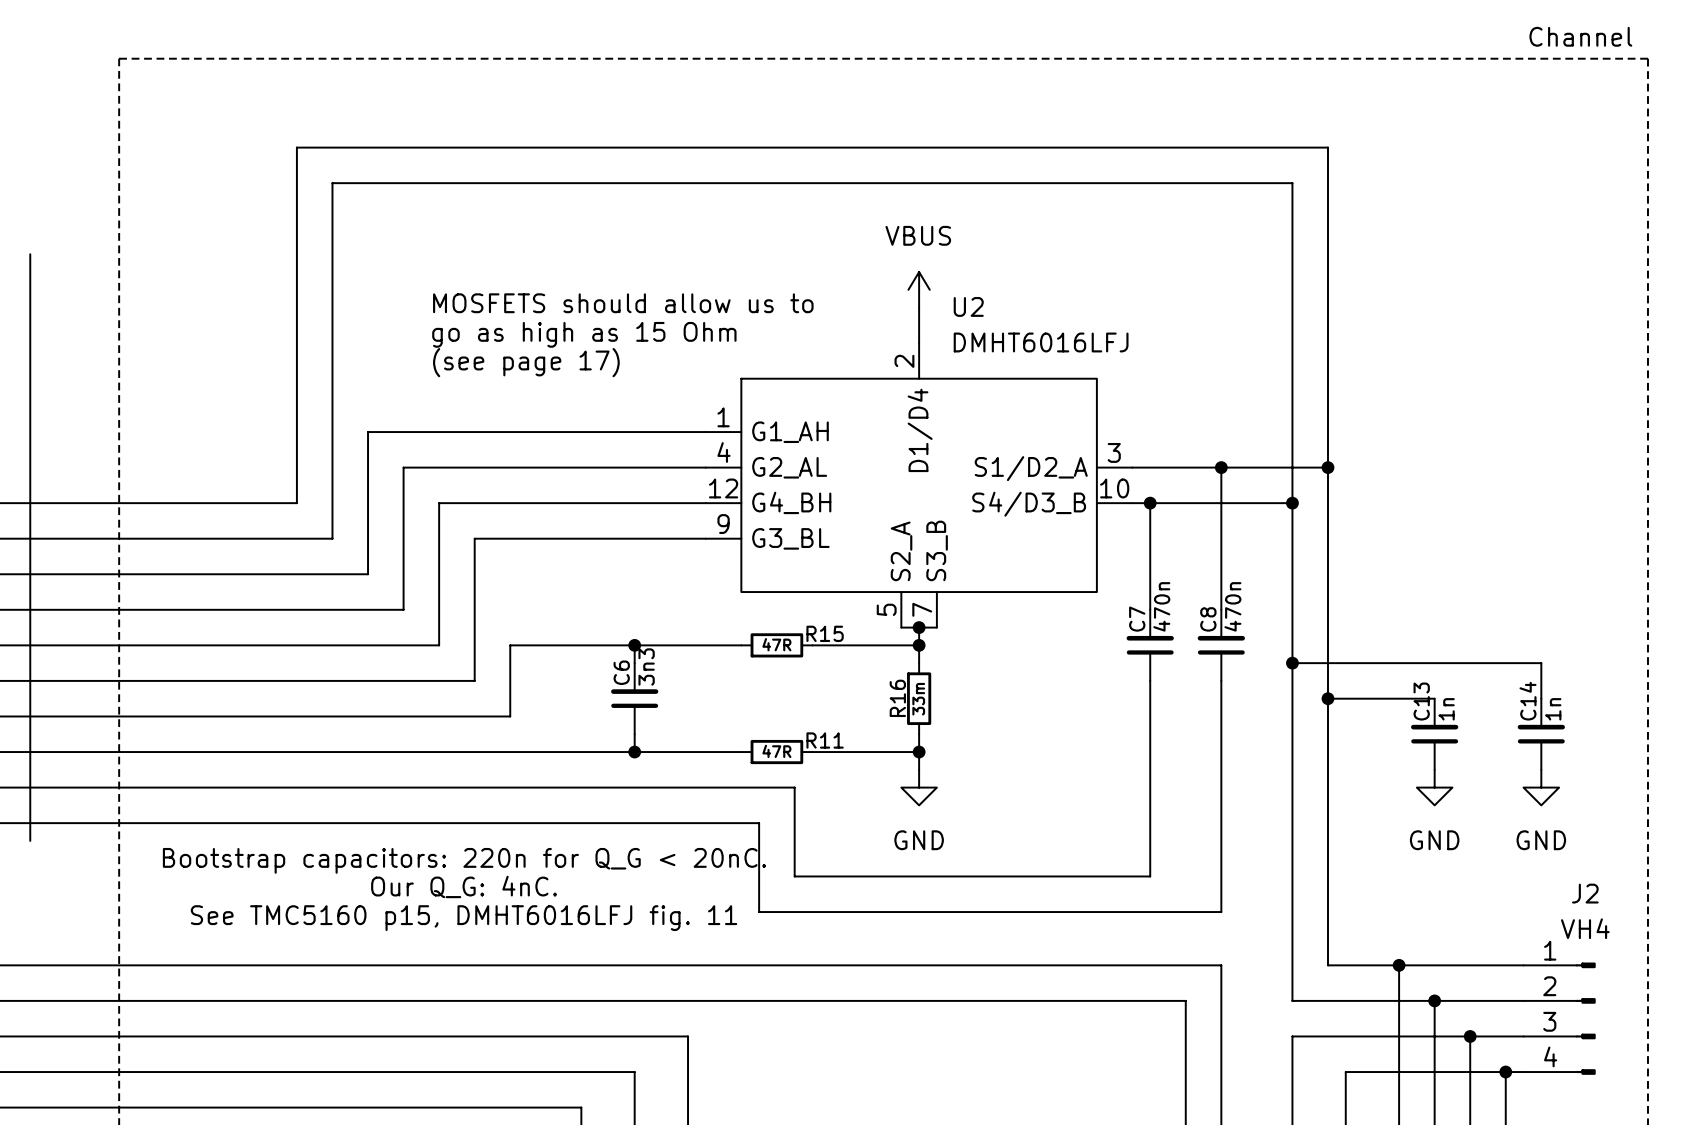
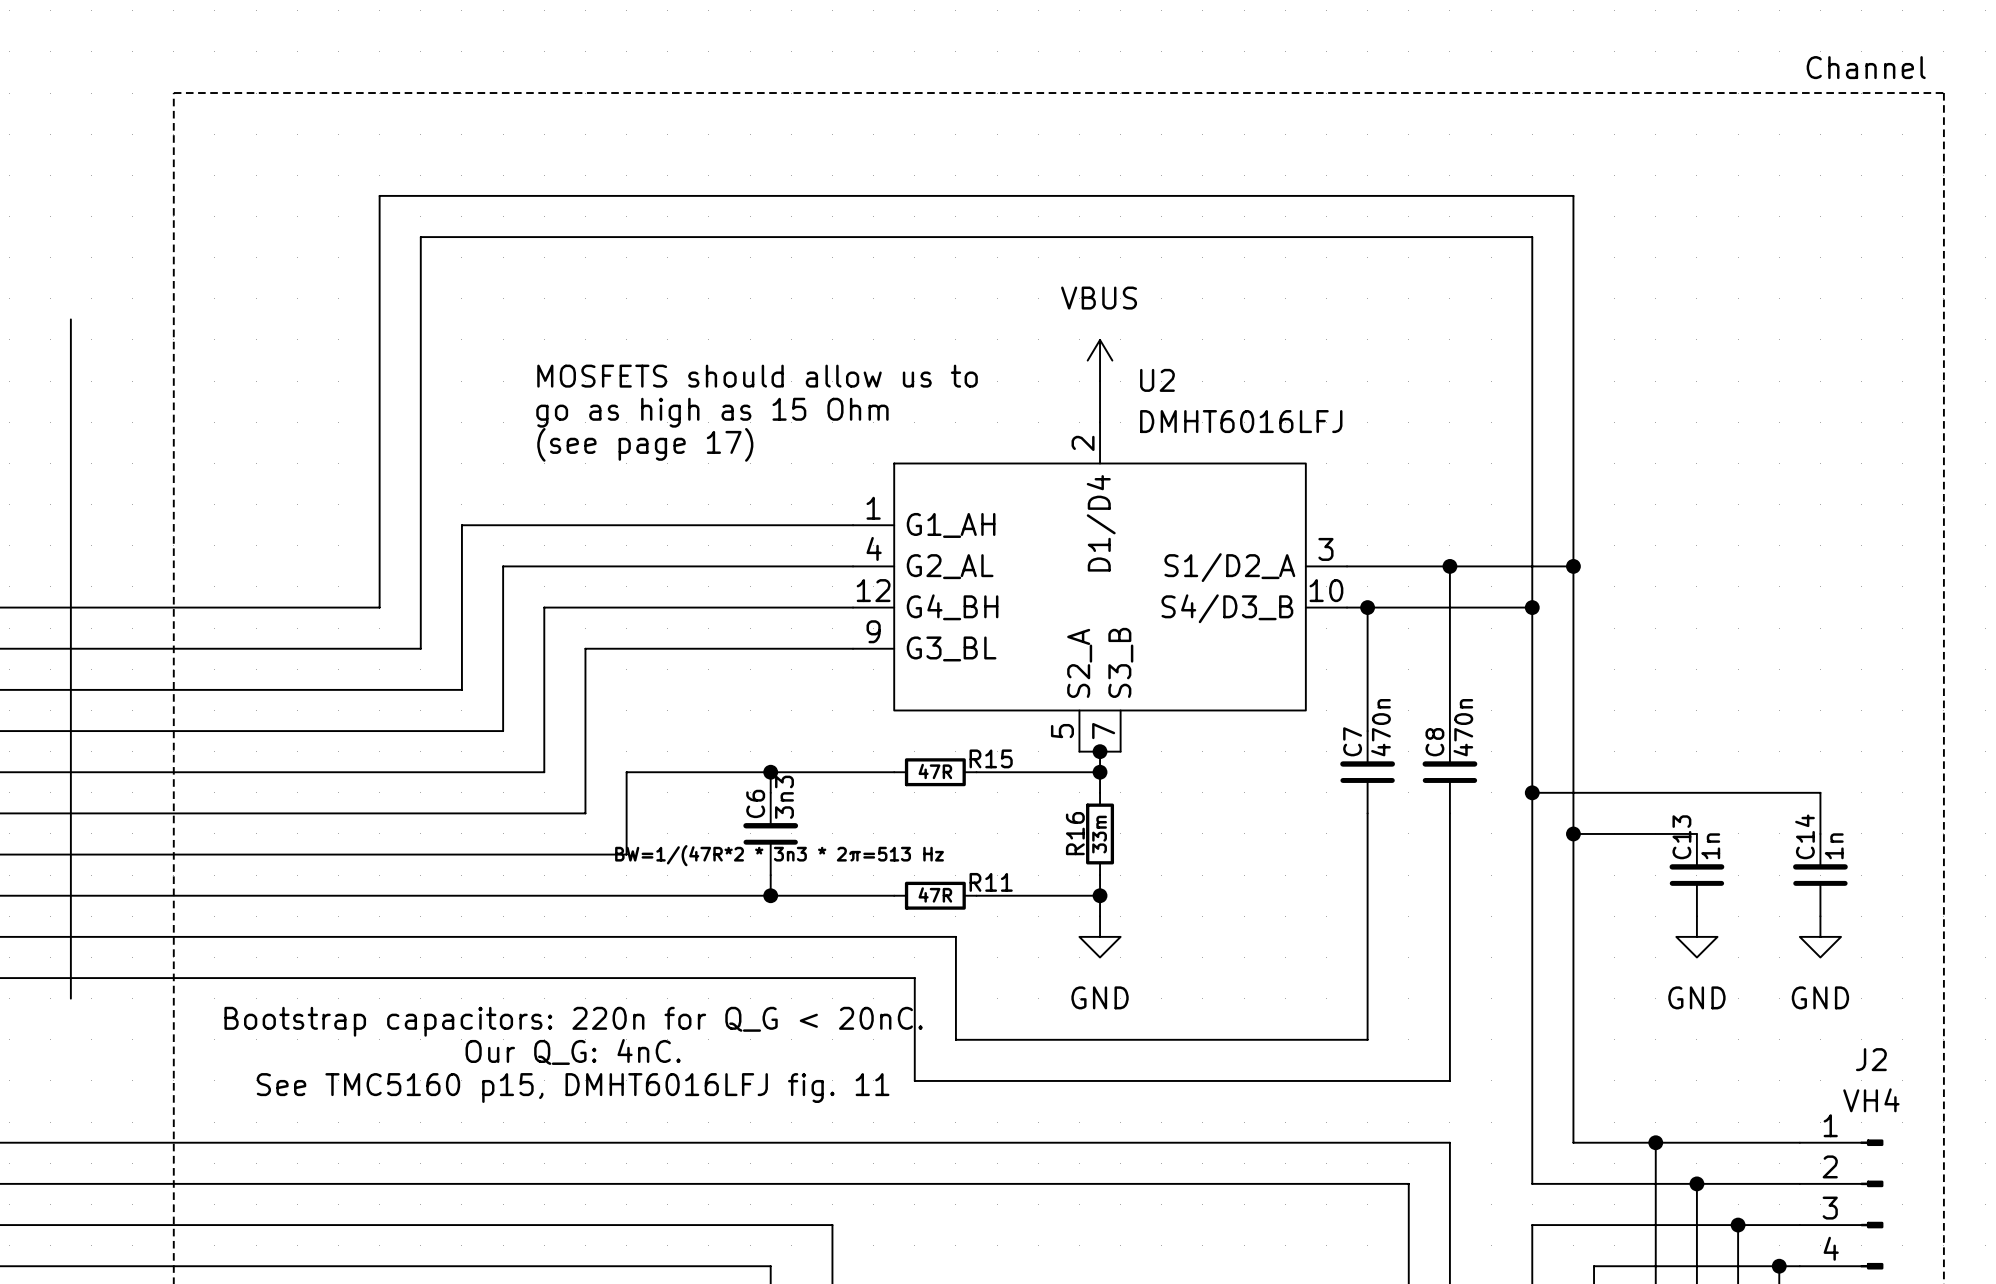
text: none -> BW=1/(47R*2 * 3n3 * 2π=513 Hz (779, 855)

